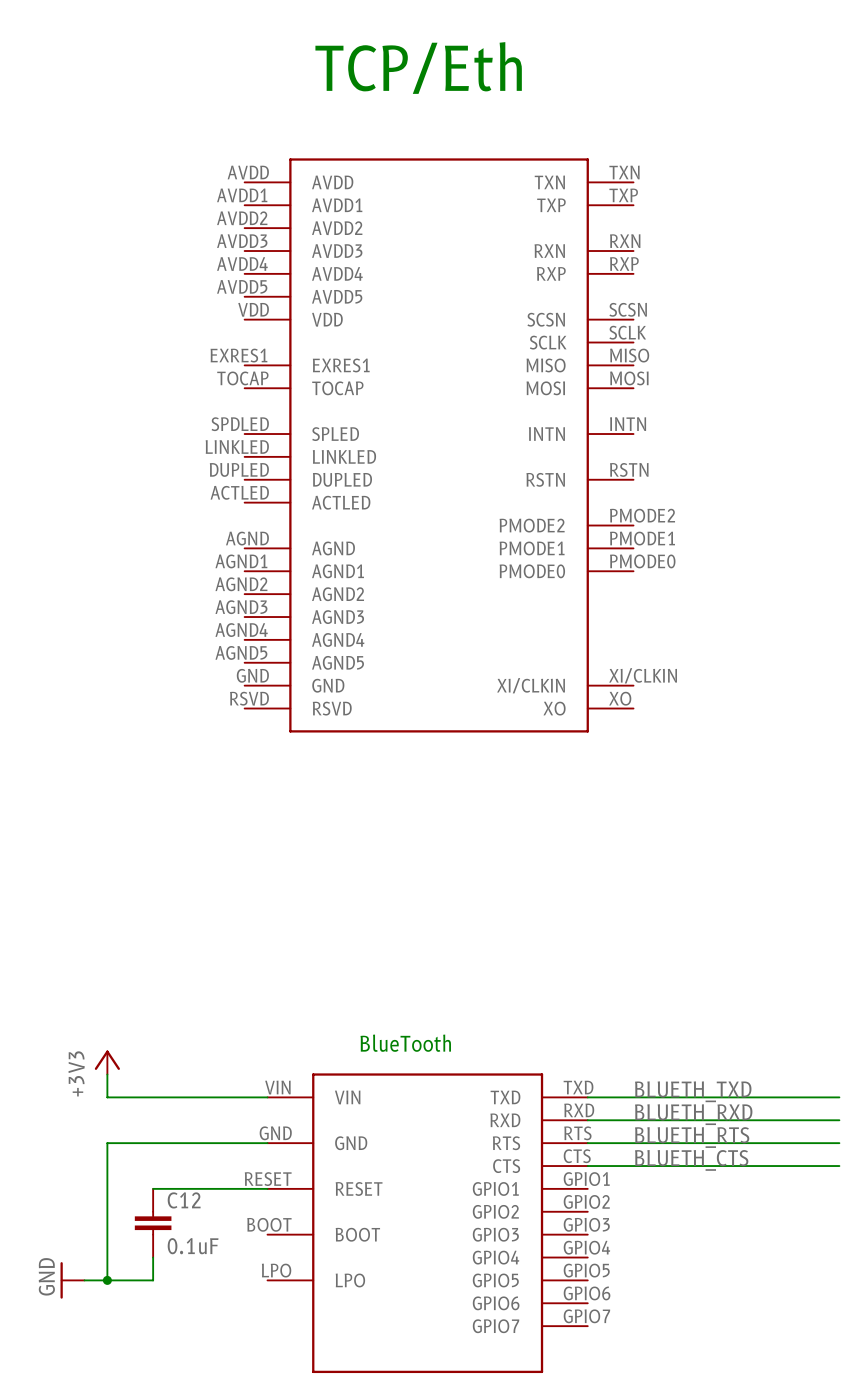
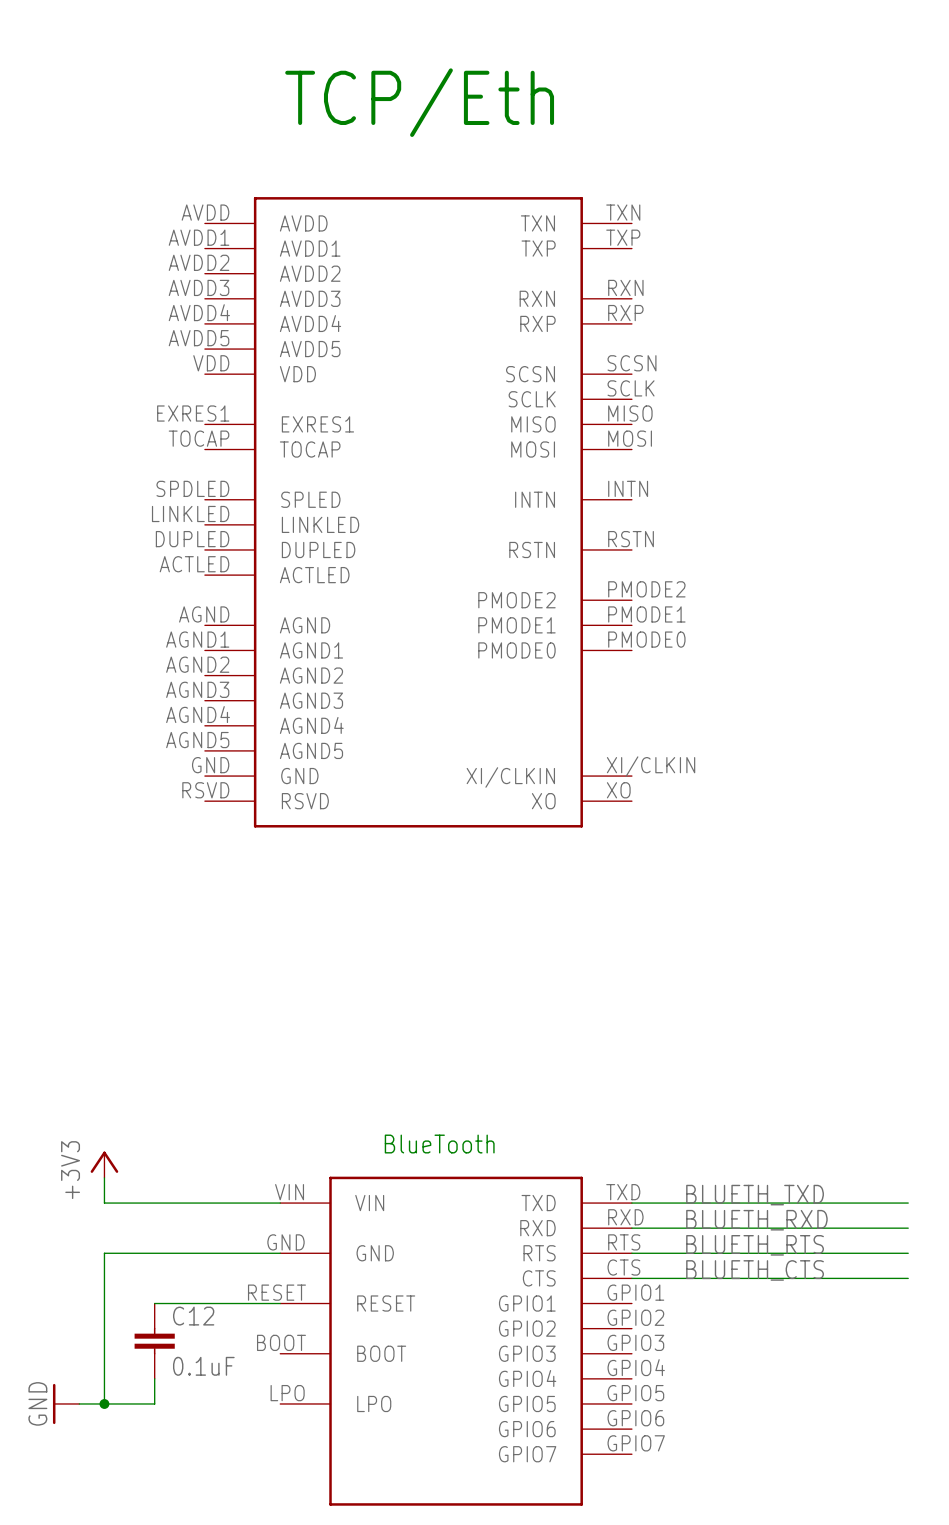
text position: TCP/Eth (418, 68) -> TCP/Eth (419, 102)
part position: (439, 445) -> (418, 512)

